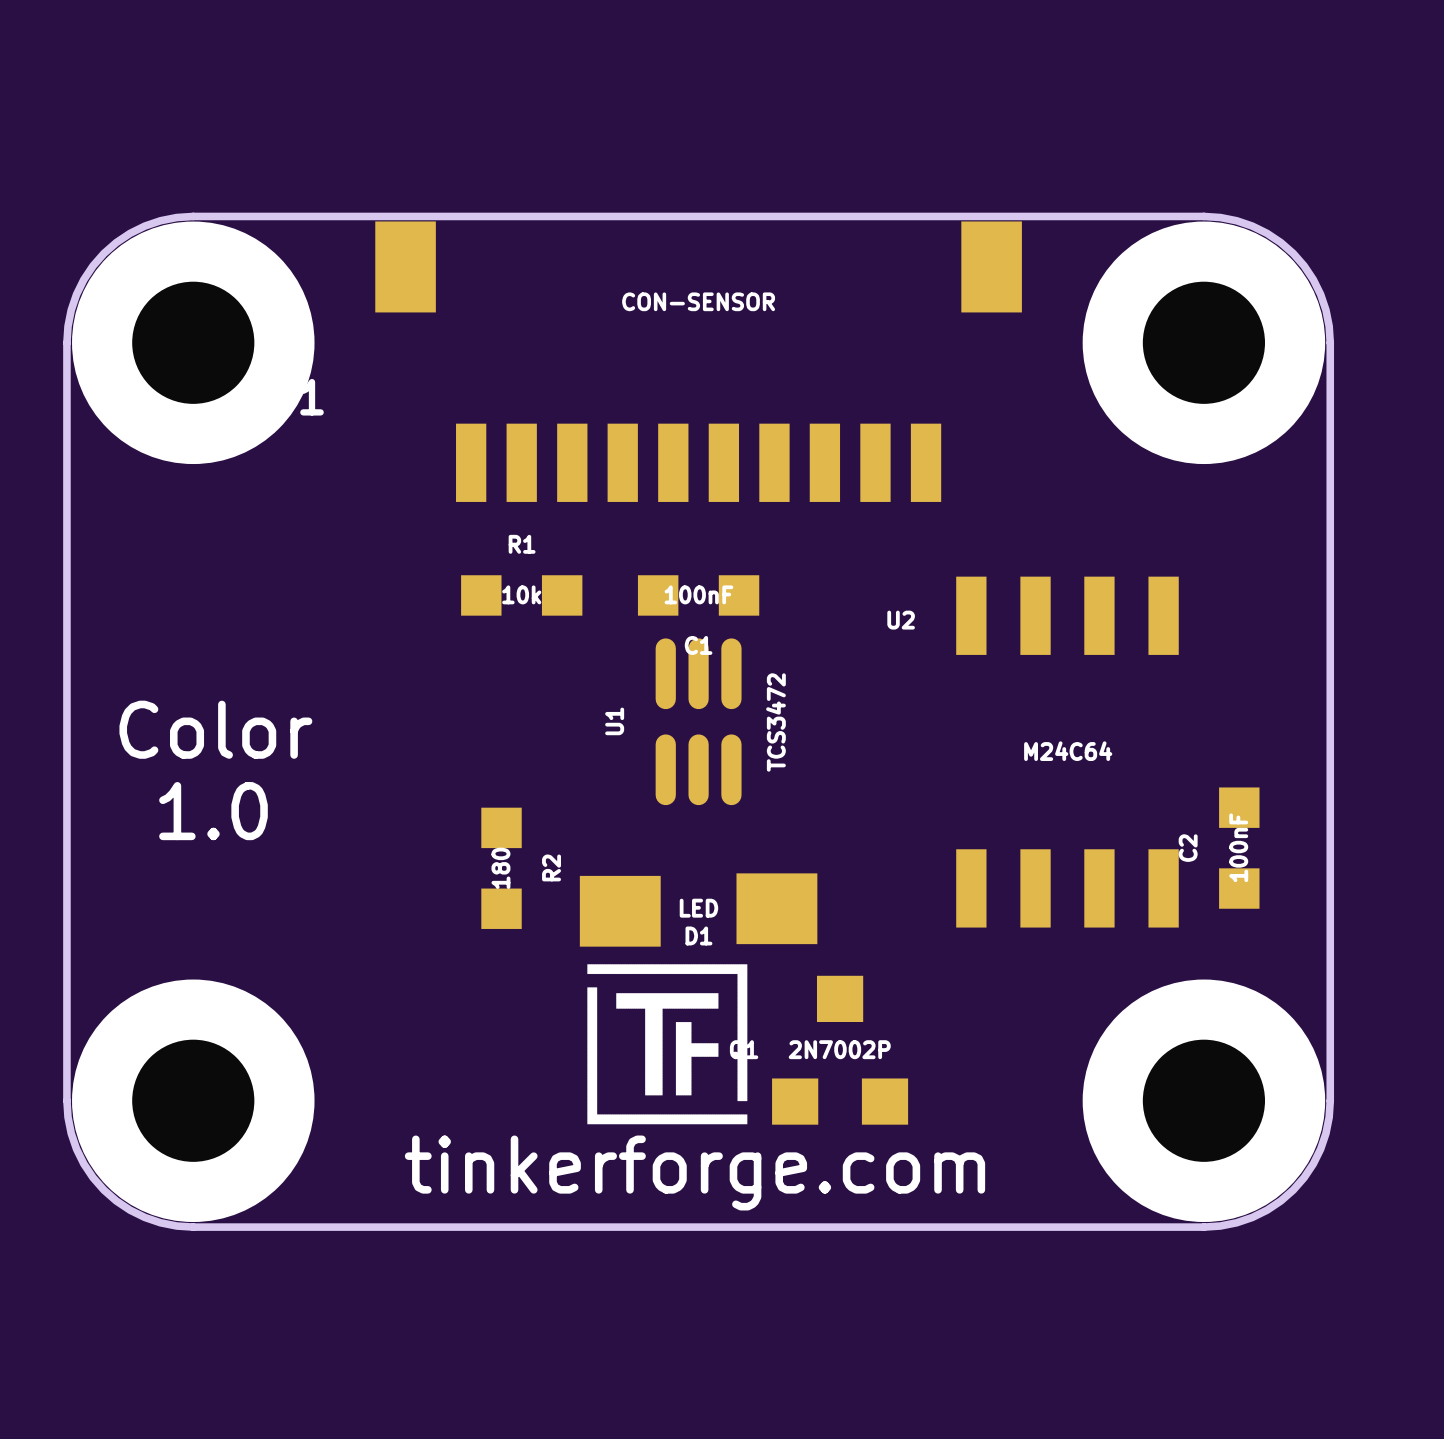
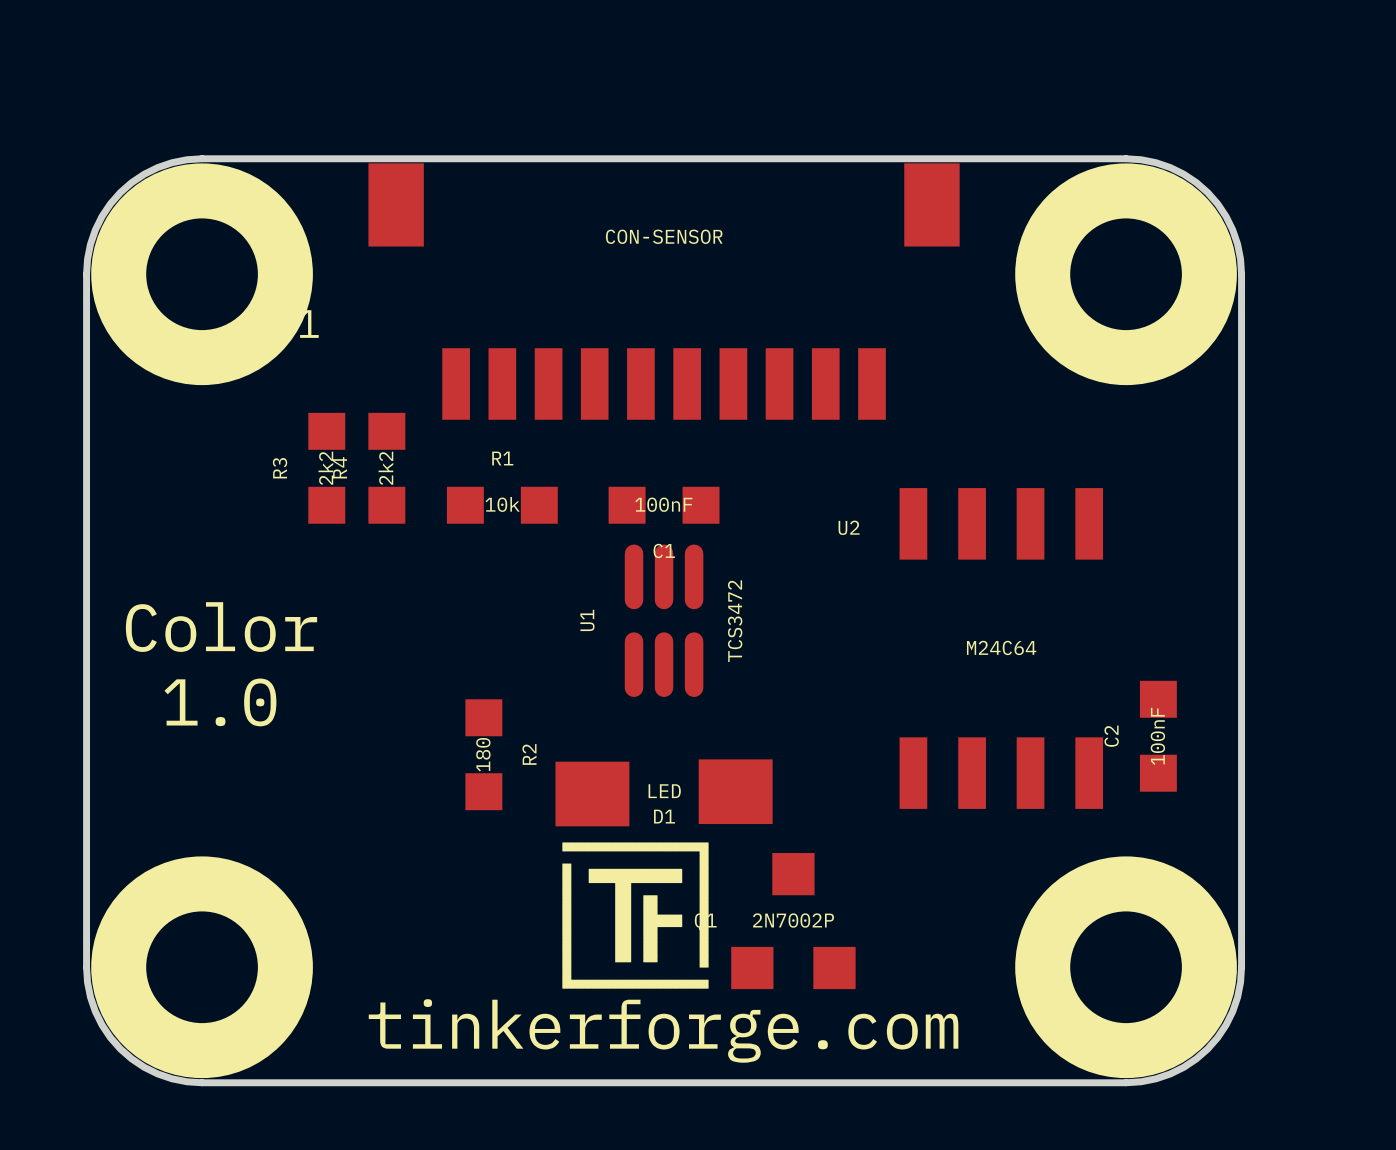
R3: none -> 2k2 (326, 468)
R4: none -> 2k2 (386, 468)

